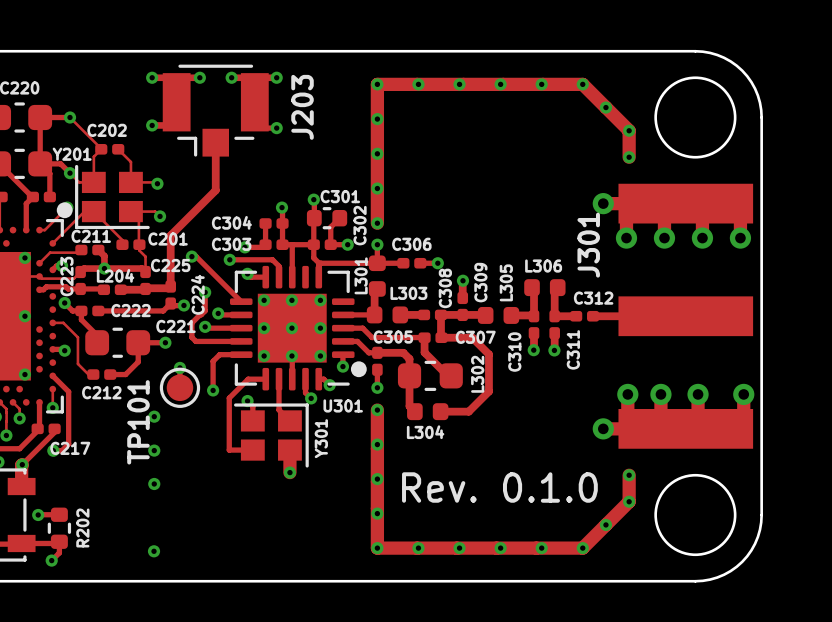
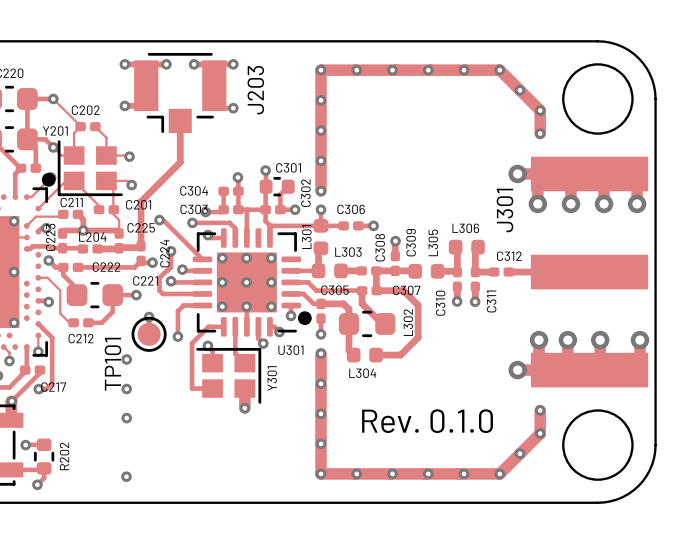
track: (80, 271) (73, 278) (41, 278) (39, 276) -> none

